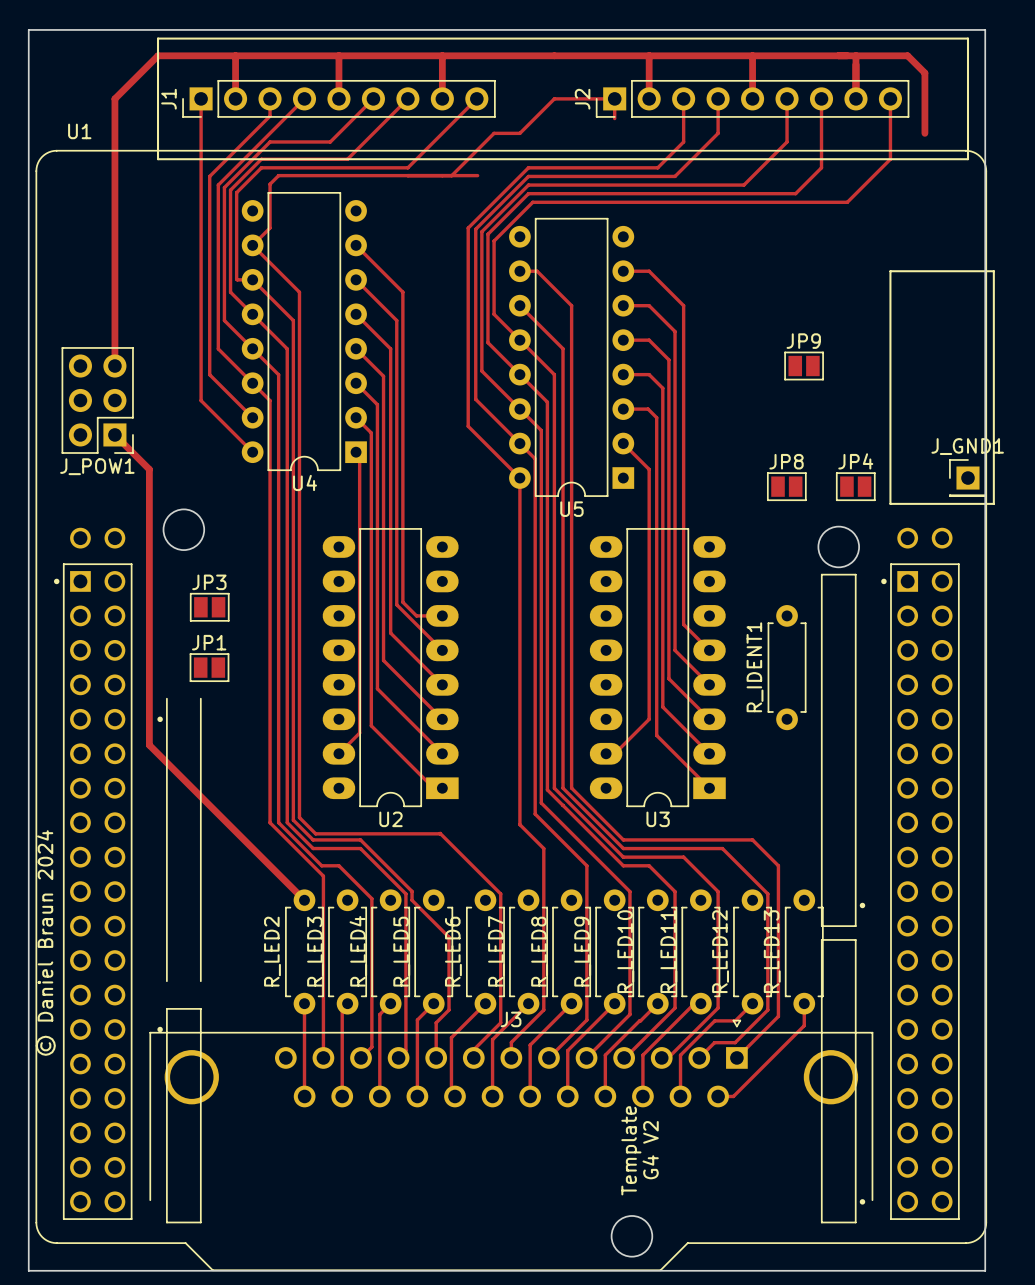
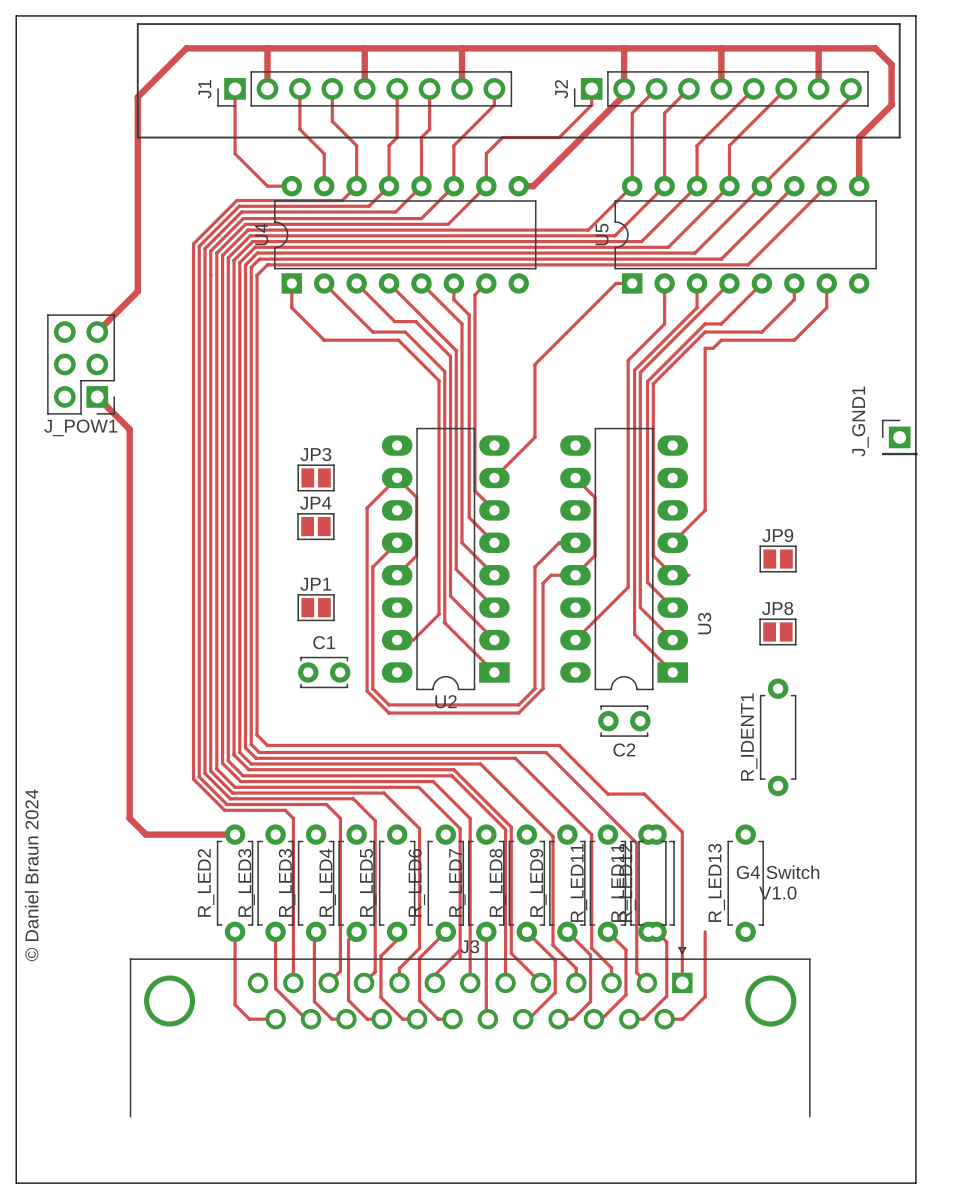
track: (235, 55) (235, 98) -> (267, 48) (267, 88)
track: (338, 55) (338, 98) -> (364, 48) (364, 88)
track: (442, 55) (442, 98) -> (462, 48) (462, 88)
track: (649, 55) (649, 98) -> none
track: (752, 55) (752, 98) -> (721, 48) (721, 88)
track: (855, 55) (855, 98) -> (818, 48) (818, 88)
track: none -> (624, 48) (624, 95) (533, 186) (518, 186)
track: (201, 98) (201, 400) (252, 452) -> none
track: (270, 98) (270, 116) (209, 176) (209, 374) (252, 417) -> none
track: (304, 98) (218, 185) (218, 348) (270, 400) (270, 822) (323, 876) (323, 883) -> (332, 88) (332, 121) (356, 145) (356, 186) (342, 200) (236, 200) (193, 243) (193, 779) (224, 810) (285, 810) (293, 818)
J1 position: (338, 98) -> (364, 88)
track: (373, 98) (330, 141) (270, 141) (224, 187) (224, 320) (278, 374) -> (794, 186) (721, 259) (259, 259) (251, 267) (251, 340)
track: (407, 98) (347, 159) (261, 159) (230, 190) (230, 292) (287, 348) (287, 822) (313, 848) (360, 848) (405, 893) (405, 1050) -> (429, 88) (429, 129) (421, 137) (421, 186) (395, 212) (241, 212) (204, 248) (204, 773) (230, 798) (353, 798) (375, 820) (375, 971) (370, 976)
track: (476, 98) (407, 167) (261, 167) (236, 192) (236, 279) (252, 279) (293, 320) (293, 820) (313, 839) (360, 839) (412, 891) (412, 900) (449, 937) (449, 1009) (436, 1022) (436, 1042) -> (210, 275) (210, 771) (232, 793) (384, 793) (419, 828) (419, 948) (399, 968)
track: (683, 98) (683, 133) -> (656, 88) (632, 113)
track: (718, 98) (718, 133) (675, 176) (528, 176) (494, 210) -> (494, 88) (494, 105) (453, 145) (453, 186)
J2 position: (752, 98) -> (721, 88)
track: (787, 98) (787, 141) (743, 185) (528, 185) (481, 231) (481, 371) -> (389, 283) (442, 336)
track: (821, 98) (821, 167) (795, 193) (528, 193) (487, 234) (487, 342) -> (421, 283) (448, 310)
track: (890, 98) (890, 159) (847, 202) (532, 202) (494, 241) (494, 314) (554, 374) (554, 788) (623, 857) (683, 857) (718, 891) (718, 1008) (668, 1057) (661, 1057) -> (851, 88) (851, 97) (695, 253) (257, 253) (245, 265) (245, 747) (255, 758) (515, 758) (591, 834) (591, 948) (611, 967) (611, 982)
track: none -> (299, 88) (299, 129) (324, 153) (324, 186)
track: none -> (397, 88) (397, 137) (389, 145) (389, 186) (368, 206) (239, 206) (199, 246) (199, 776) (226, 804) (326, 804) (340, 818) (338, 972)
track: none -> (688, 88) (664, 113) (664, 186) (614, 235) (250, 235) (228, 257) (228, 760) (243, 775) (451, 775) (505, 829) (505, 982)
track: none -> (753, 88) (697, 145) (697, 186) (641, 241) (252, 241) (234, 260) (234, 754) (248, 769) (453, 769)
track: none -> (235, 97) (235, 153) (267, 186) (291, 186)
track: (614, 118) (614, 98) (554, 98) (519, 133) (494, 133) (451, 175) -> none
track: (924, 133) (924, 73) (907, 55) (158, 55) (114, 98) (114, 366) -> (859, 186) (859, 137) (891, 105) (891, 64) (875, 48) (186, 48) (137, 97) (137, 291) (97, 332)
track: (683, 141) (657, 167) (528, 167) (468, 228) (468, 426) (519, 478) (519, 824) (543, 848) (543, 1009) (511, 1042) -> (632, 121) (632, 186) (588, 230) (247, 230) (222, 255) (222, 763) (240, 781) (433, 781) (470, 818) (470, 968)
track: (477, 175) (278, 175) (270, 184) (270, 228) (252, 245) (299, 292) (299, 817) (315, 833) (440, 833) (456, 849) -> (591, 88) (591, 105) (559, 137) (502, 137) (486, 153) (486, 186) (448, 224) (245, 224) (216, 253) (216, 769) (235, 787) (418, 787)
track: (475, 229) (475, 399) -> (324, 283) (372, 332) (405, 332) (436, 363)
track: none -> (436, 203) (421, 218) (243, 218) (210, 251) (210, 275)
track: (356, 245) (402, 292) (402, 602) (416, 615) (442, 615) -> none
track: (519, 271) (537, 271) (571, 305) (571, 788) (623, 839) (752, 839) (778, 865) (778, 1016) (736, 1057) -> (826, 186) (748, 264) (267, 264) (257, 275) (257, 734) (267, 745) (559, 745) (607, 794) (644, 794) (682, 832) (682, 982)
track: (623, 271) (649, 271) (683, 305) (683, 624) (709, 650) -> none
line: (890, 271) (993, 271) (993, 503) (890, 503) (890, 271) -> none
track: (356, 279) (396, 320) (396, 604) (442, 650) -> none
track: (519, 305) (563, 348) (563, 788) (623, 848) (722, 848) (767, 893) (767, 1009) (735, 1042) (714, 1042) (699, 1057) -> none
track: (623, 305) (649, 305) (675, 331) (675, 650) (709, 684) -> none
track: none -> (291, 283) (291, 307) (324, 340) (398, 340) (439, 380) (439, 614) (413, 640) (397, 640)
track: (356, 314) (390, 348) (390, 633) (442, 684) -> none
track: none -> (356, 283) (394, 321) (415, 321) (450, 356) (450, 596) (494, 640)
track: none -> (453, 283) (453, 299) (469, 314) (469, 517) (494, 542)
track: none -> (486, 283) (474, 294) (474, 490) (494, 510)
track: none -> (632, 283) (616, 283) (534, 364) (534, 437) (494, 477)
track: none -> (664, 283) (664, 323) (628, 360) (628, 587) (575, 640)
track: none -> (697, 283) (697, 307) (634, 370) (634, 634) (672, 672)
track: none -> (729, 283) (640, 372) (640, 607) (672, 640)
track: none -> (761, 283) (721, 323) (705, 323) (647, 381) (647, 582) (672, 607)
track: none -> (794, 283) (794, 299) (761, 332) (705, 332) (653, 383) (653, 555) (672, 575) (688, 575)
track: none -> (826, 283) (826, 307) (794, 340) (721, 340) (713, 348) (705, 348) (705, 510) (672, 542)
U4 rotation: 0° (304, 331) -> 90° clockwise (405, 234)
track: (623, 340) (649, 340) (668, 359) (668, 678) (709, 719) -> none
track: (356, 348) (383, 376) (383, 660) (442, 719) -> none
track: (502, 357) (547, 402) (547, 789) (623, 865) (649, 865) (675, 891) (675, 1008) (624, 1057) -> (786, 88) (729, 145) (729, 186) (668, 247) (255, 247) (239, 262) (239, 752) (251, 764) (480, 764) (553, 836) (553, 945) (576, 968) (576, 982)
track: none -> (462, 323) (462, 542) (494, 575)
U5 rotation: 0° (571, 357) -> 90° clockwise (745, 234)
U5 position: (571, 357) -> (745, 234)
JP9 position: (804, 366) -> (778, 559)
track: (623, 374) (649, 374) (662, 388) (662, 707) (709, 753) -> none
track: (356, 383) (377, 404) (377, 688) (442, 753) -> none
track: (496, 385) (541, 430) (541, 802) (629, 891) (629, 1014) (586, 1057) -> (456, 350) (456, 569) (494, 607)
track: (484, 408) (535, 458) (535, 814) (586, 865) (586, 1020) (548, 1057) -> (444, 371) (444, 622) (494, 672)
track: (623, 409) (648, 409) (656, 417) (656, 735) (709, 788) -> none
track: (356, 417) (371, 432) (371, 725) (433, 788) (442, 788) -> none
track: (623, 443) (649, 469) (649, 719) (614, 753) (606, 753) -> none
J_GND1 name rotation: 0° (967, 446) -> 90° counterclockwise (860, 421)
track: (356, 452) (359, 455) (359, 733) (338, 753) -> none
JP8 position: (786, 486) -> (777, 631)
JP4 position: (855, 486) -> (315, 526)
track: none -> (575, 477) (594, 497) (594, 555) (575, 575) (551, 575) (543, 583) (543, 688) (518, 713) (389, 713) (367, 691) (367, 508) (397, 477) (416, 497) (416, 555) (397, 575)
track: none -> (397, 542) (372, 567) (372, 688) (389, 704) (518, 704) (534, 688) (534, 567) (559, 542) (575, 542)
JP3 position: (209, 607) -> (316, 477)
JP1 position: (209, 667) -> (316, 607)
U2 position: (390, 667) -> (445, 559)
U3 position: (657, 667) -> (624, 559)
R_IDENT1 position: (787, 667) -> (778, 737)
U1: (511, 710) -> none
C1: none -> (324, 672)
track: (149, 745) (304, 900) -> (129, 688) (129, 818) (145, 834) (235, 834)
C2: none -> (624, 721)
track: (278, 804) (278, 822) (321, 865) (338, 865) (371, 898) (371, 1047) -> (251, 744) (259, 752) (546, 752) (636, 843) (636, 972) (646, 982)
U3 name rotation: 0° (658, 819) -> 90° counterclockwise (704, 623)
U3 name position: U3 (658, 819) -> U3 (704, 623)
track: none -> (453, 769) (511, 827) (511, 953) (540, 982)
text: none -> G4 Switch (777, 872)
R_LED2: none -> (235, 883)
R_LED2 name: R_LED2 (272, 951) -> R_LED3 (246, 882)
R_LED10 name: R_LED10 (625, 951) -> R_LED11 (579, 882)
R_LED12 position: (752, 951) -> (656, 883)
text: none -> V1.0 (777, 893)
track: none -> (235, 931) (235, 1004) (249, 1019) (275, 1019)
track: (433, 1003) (417, 1020) (417, 1096) -> (348, 939) (348, 1000) (367, 1019) (381, 1019)
track: (528, 1003) (492, 1039) (492, 1096) -> (486, 931) (486, 1017) (487, 1019)
track: (571, 1003) (530, 1045) (530, 1096) -> (526, 931) (555, 960) (555, 992) (528, 1019) (523, 1019)
track: (614, 1003) (567, 1050) (567, 1096) -> (567, 931) (590, 955) (590, 1001) (573, 1019) (561, 1019)
track: (657, 1003) (605, 1055) (605, 1096) -> (607, 931) (625, 949) (625, 994) (601, 1019) (593, 1019)
track: (700, 1003) (694, 1003) (642, 1055) (642, 1096) -> none
track: (752, 1003) (735, 1020) (714, 1020) (680, 1055) (680, 1096) -> (656, 931) (666, 942) (666, 996) (643, 1019) (629, 1019)
track: (804, 1003) (804, 1025) (733, 1096) -> (705, 931) (705, 996) (682, 1019) (679, 1019)
track: (345, 1005) (342, 1009) (342, 1096) -> none
track: (382, 1012) (379, 1014) (379, 1096) -> (314, 933) (314, 1001) (331, 1019) (346, 1019)
track: (457, 1031) (451, 1037) (451, 1092) (454, 1096) -> (405, 931) (380, 956) (380, 997) (402, 1019) (417, 1019)
track: none -> (419, 958) (419, 1000) (438, 1019) (452, 1019)
track: (304, 1063) (304, 1096) -> (275, 988) (306, 1019) (311, 1019)
text: Template (631, 1150) -> none
text: G4 V2 (650, 1150) -> none

